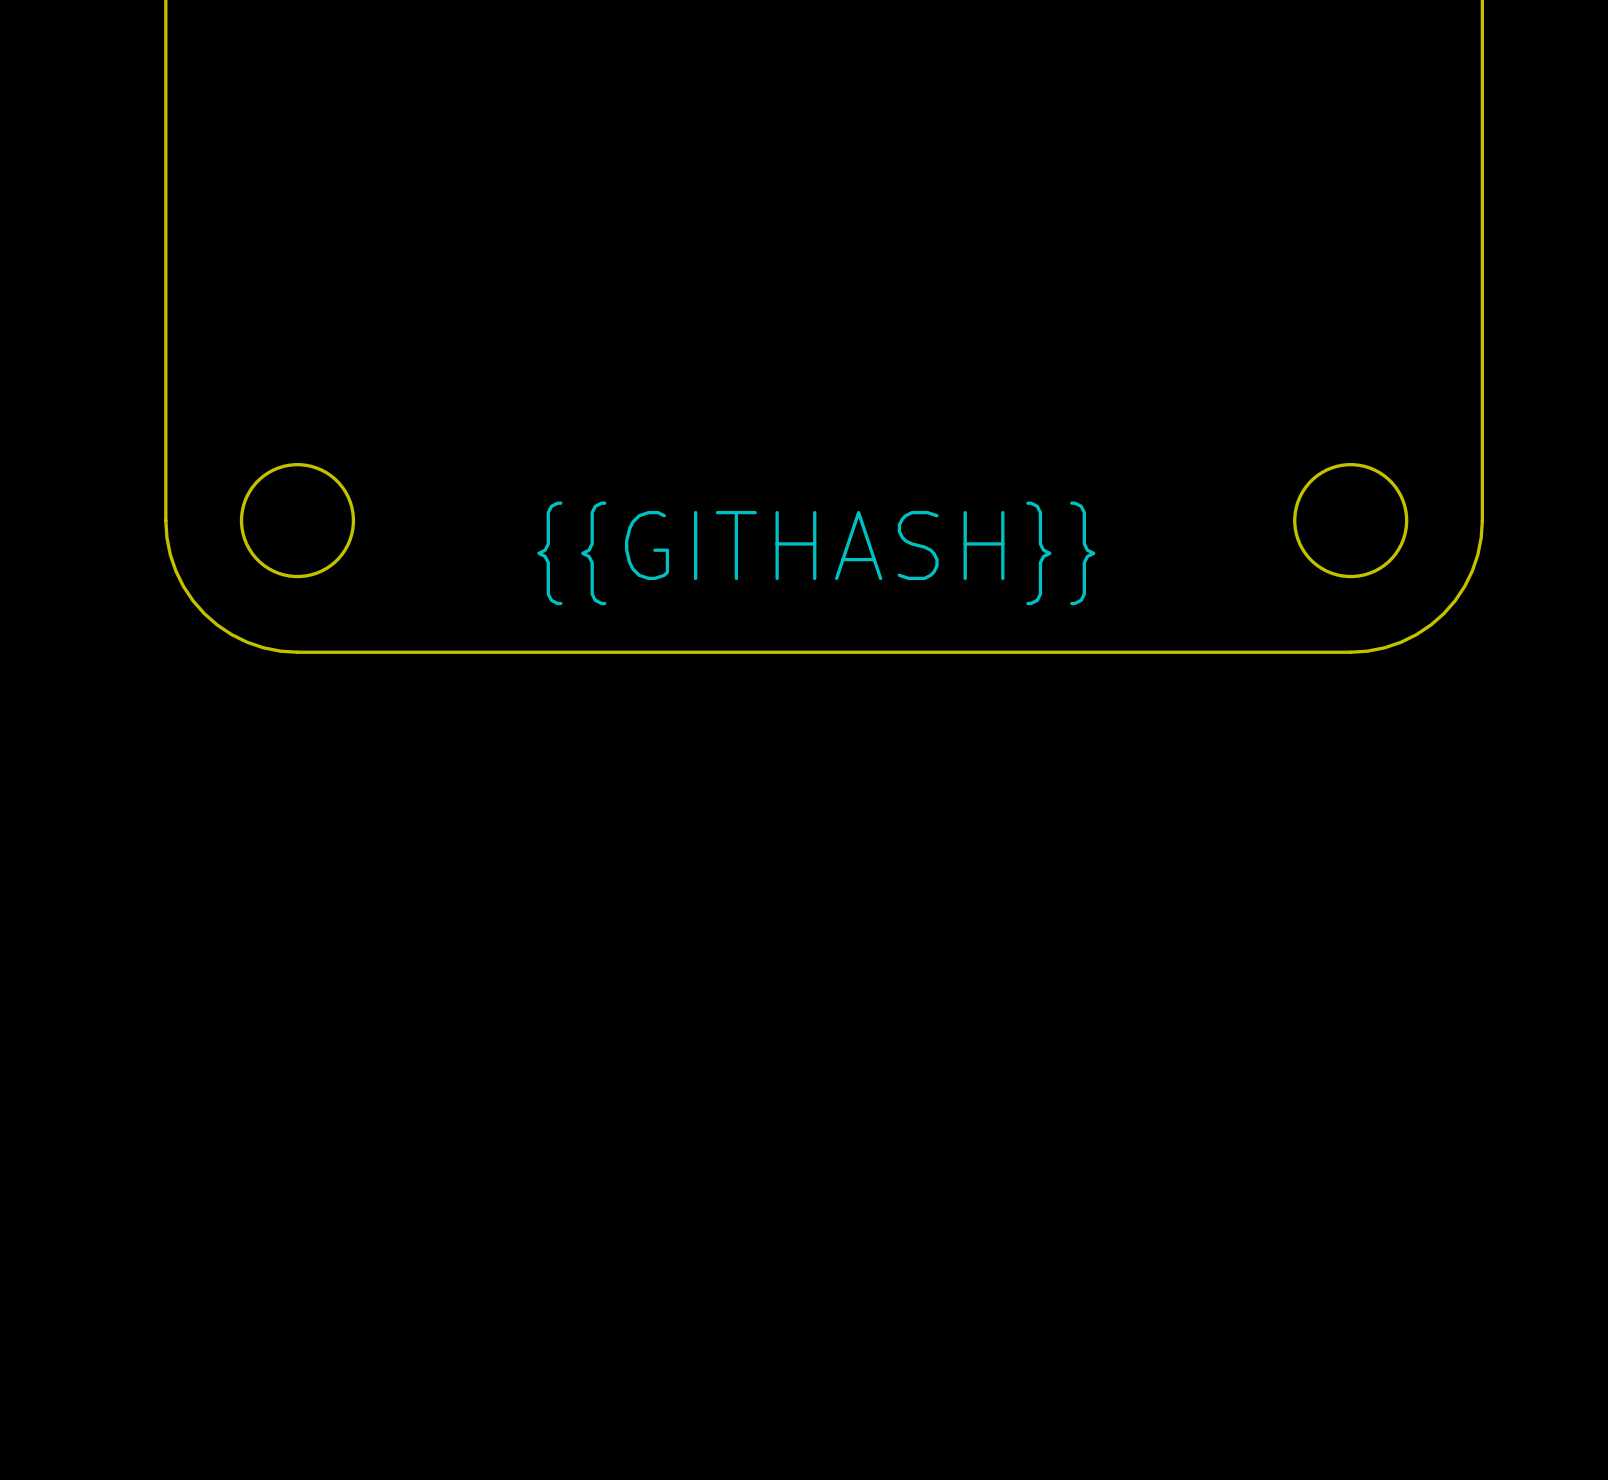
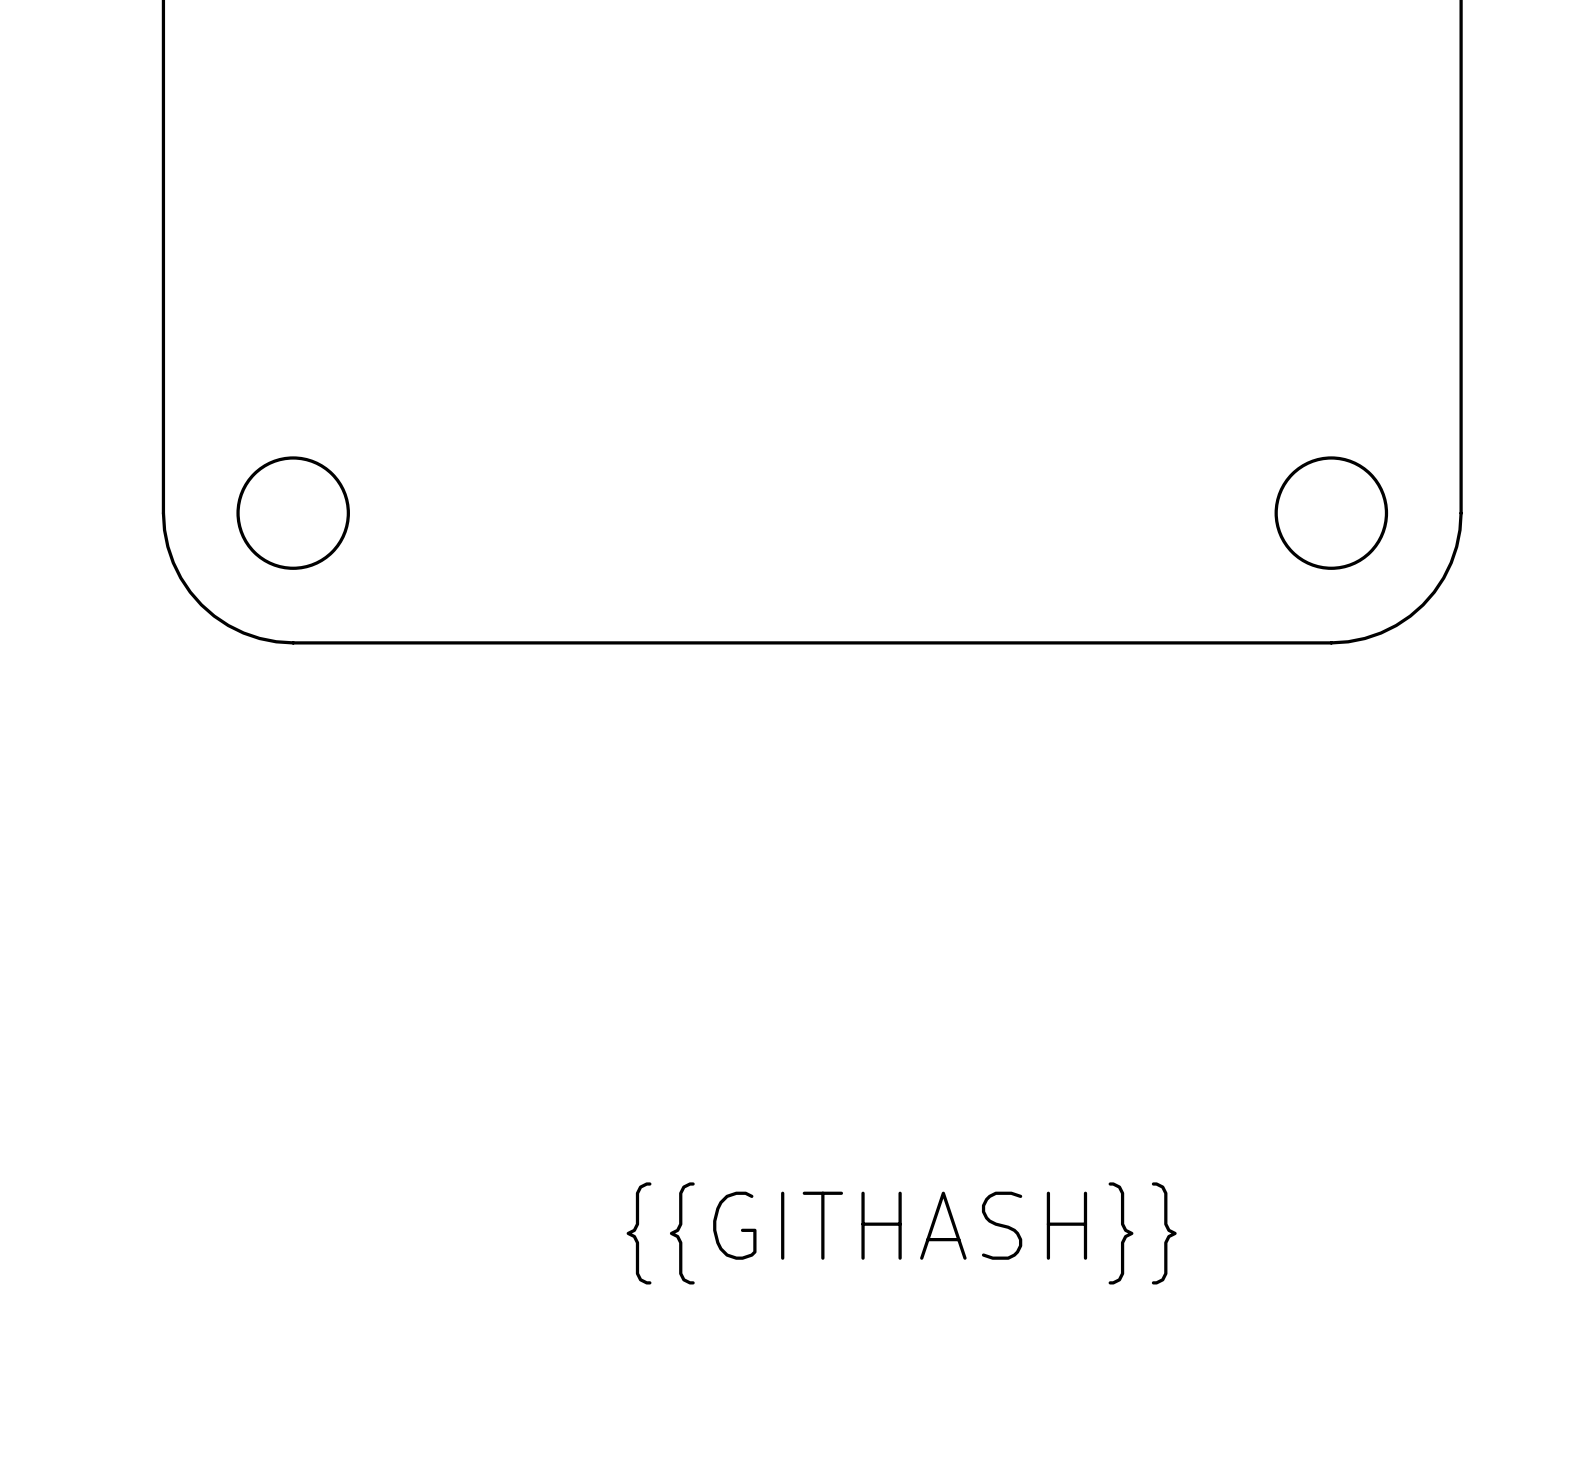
text position: {{GITHASH}} (816, 553) -> {{GITHASH}} (901, 1233)

